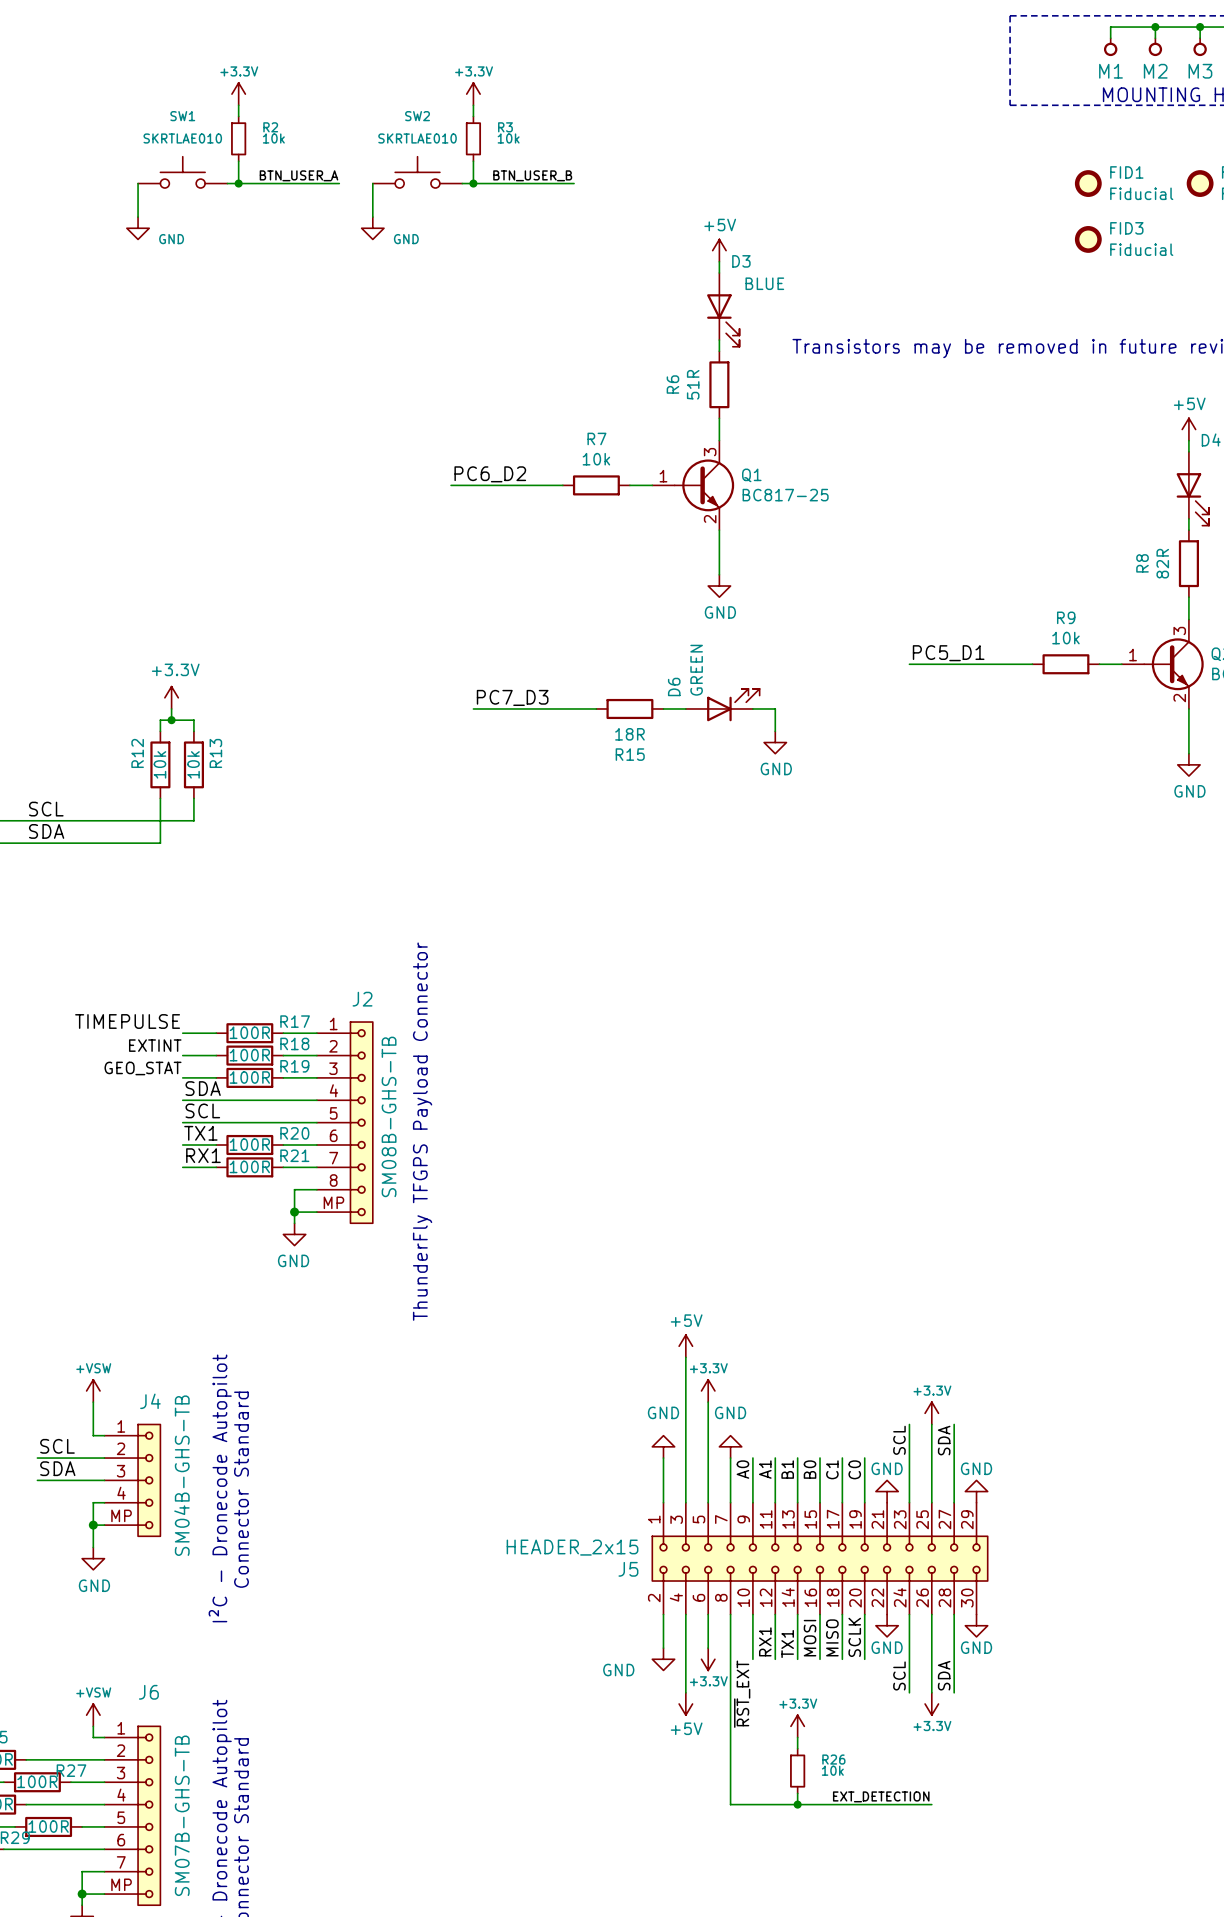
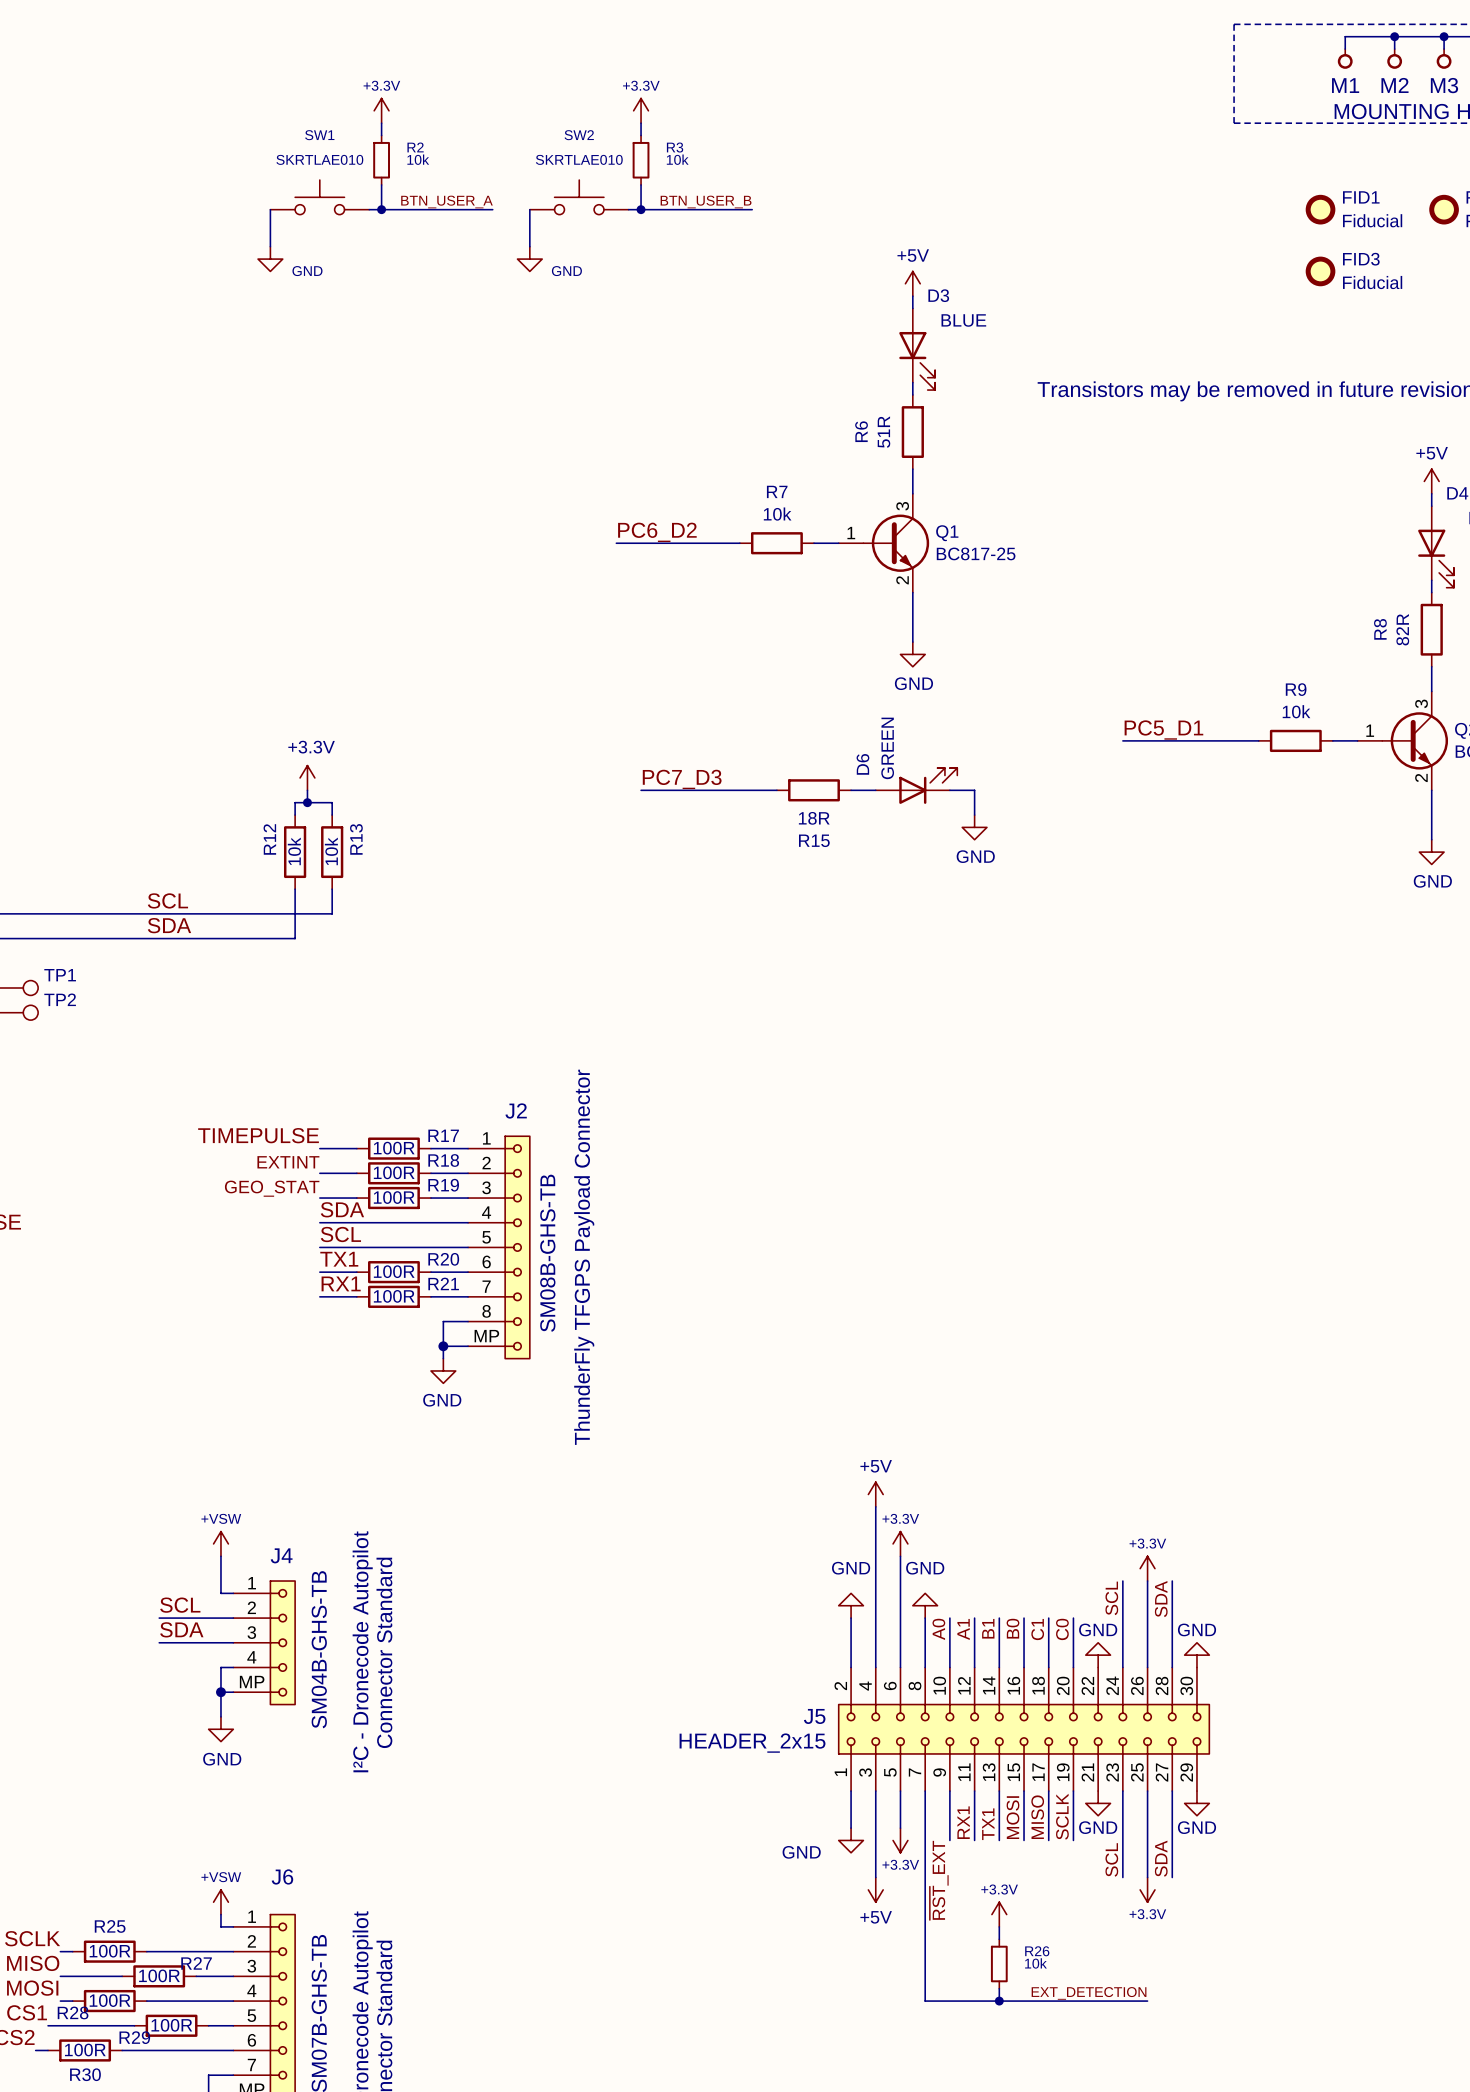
J5 flip: as is (820, 1558) -> up-down (1024, 1729)

